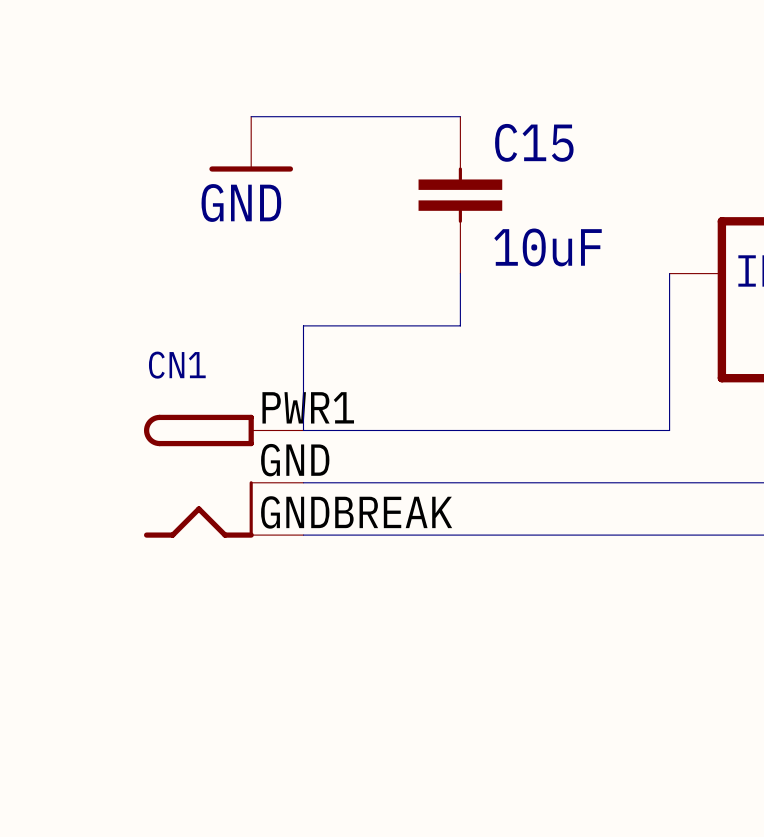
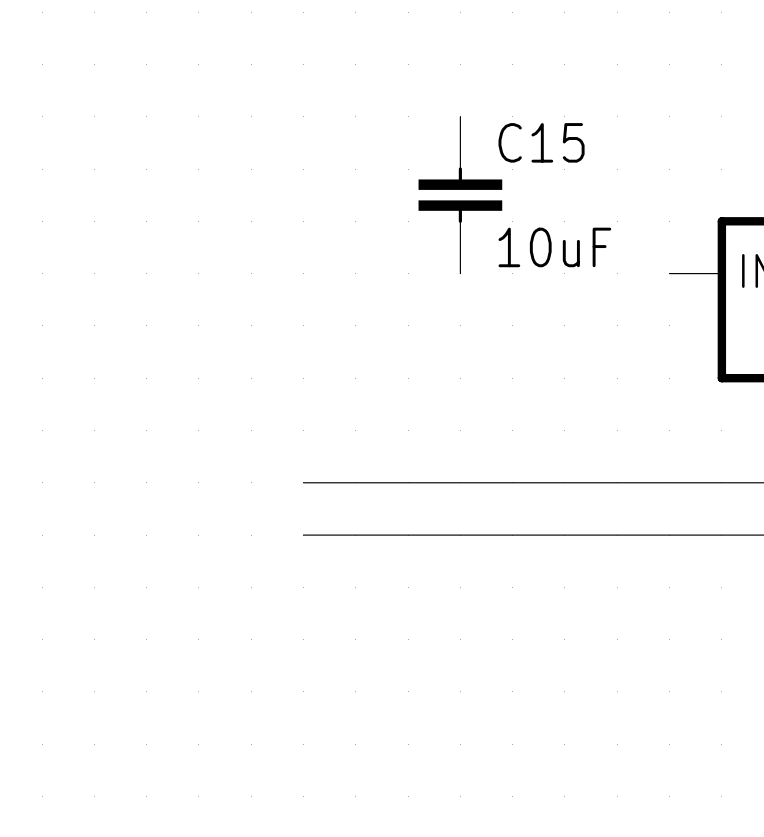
wire: (251, 116) (460, 116) -> none
power symbol: GND (251, 144) -> none
wire: (460, 273) (460, 325) (303, 325) (303, 430) (669, 430) (669, 273) -> none
CN1: (223, 476) -> none

